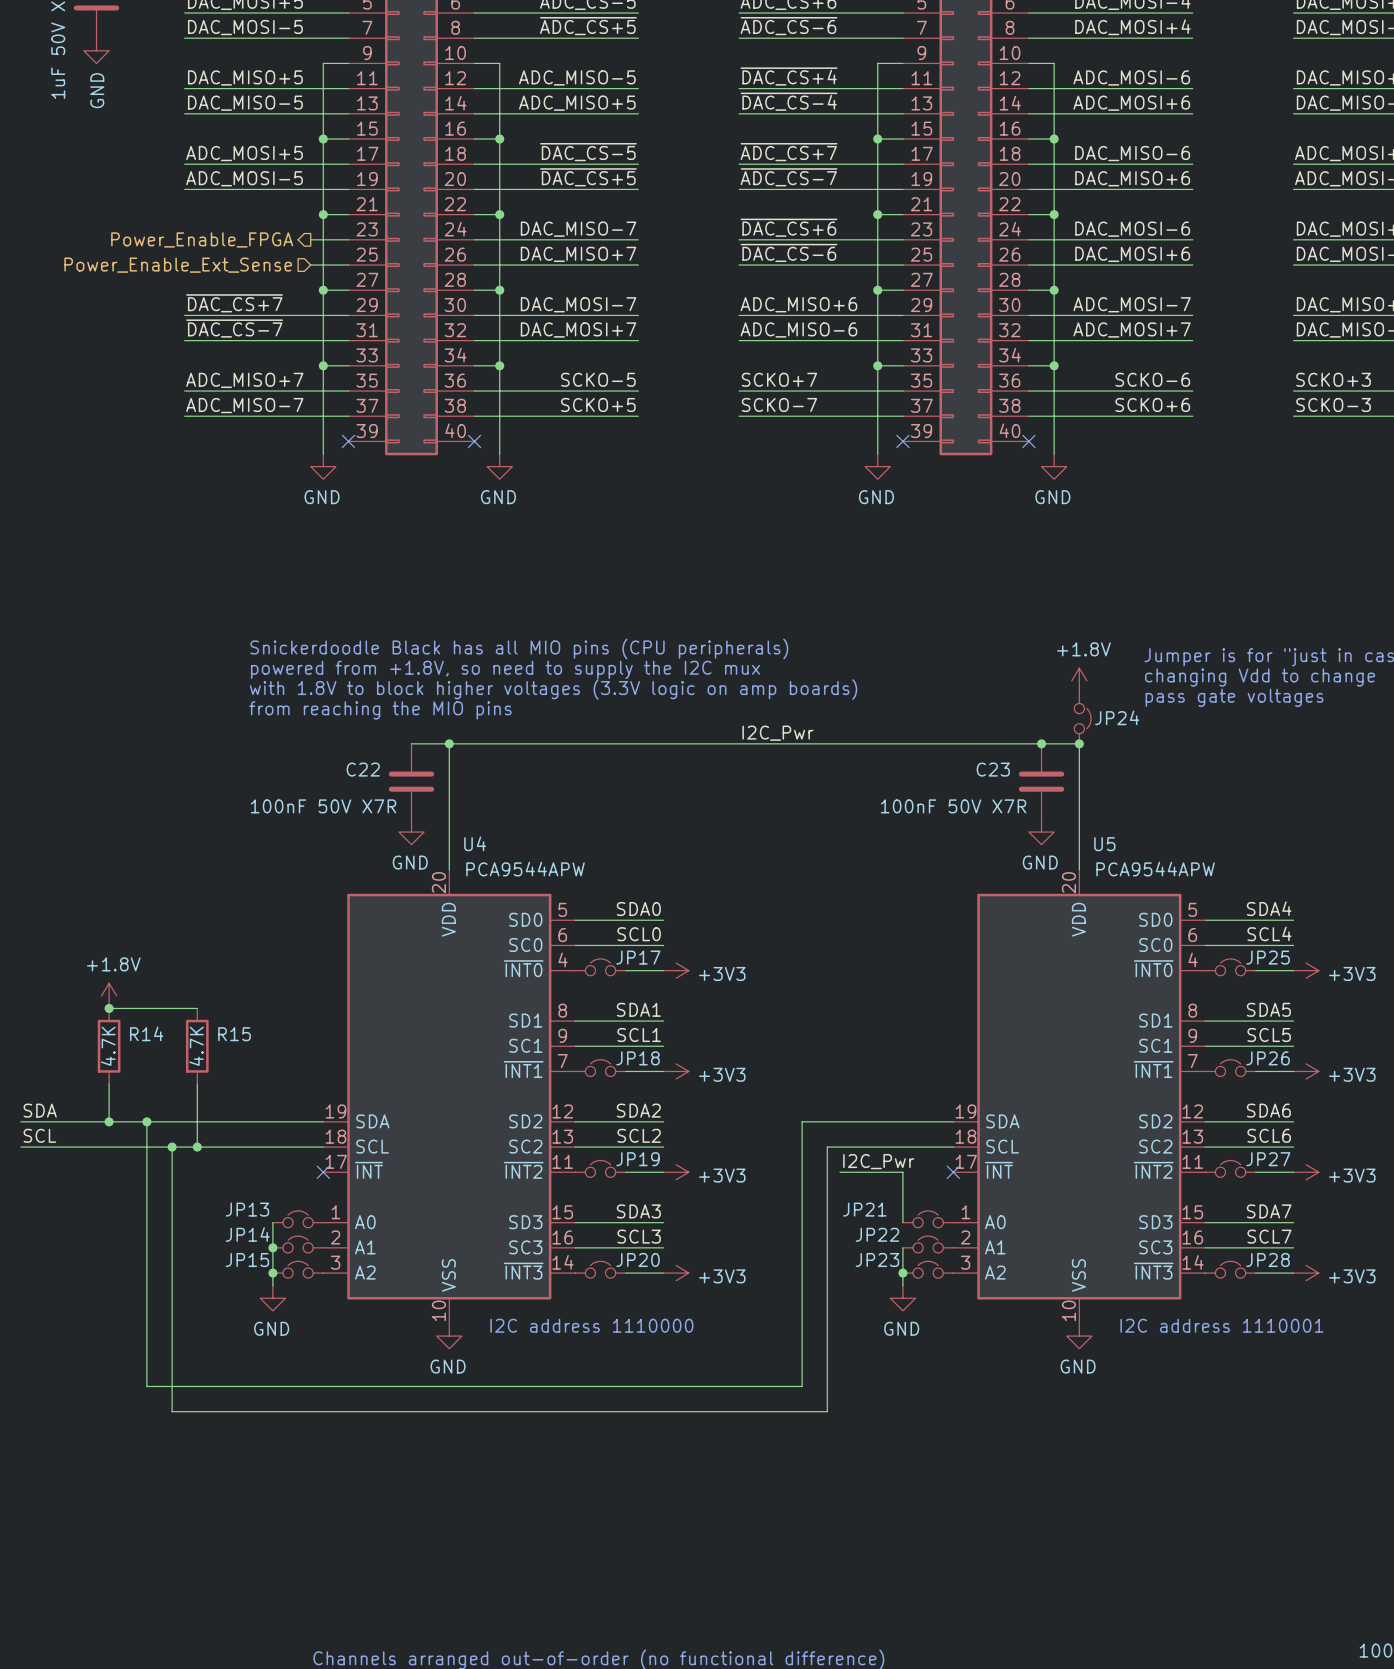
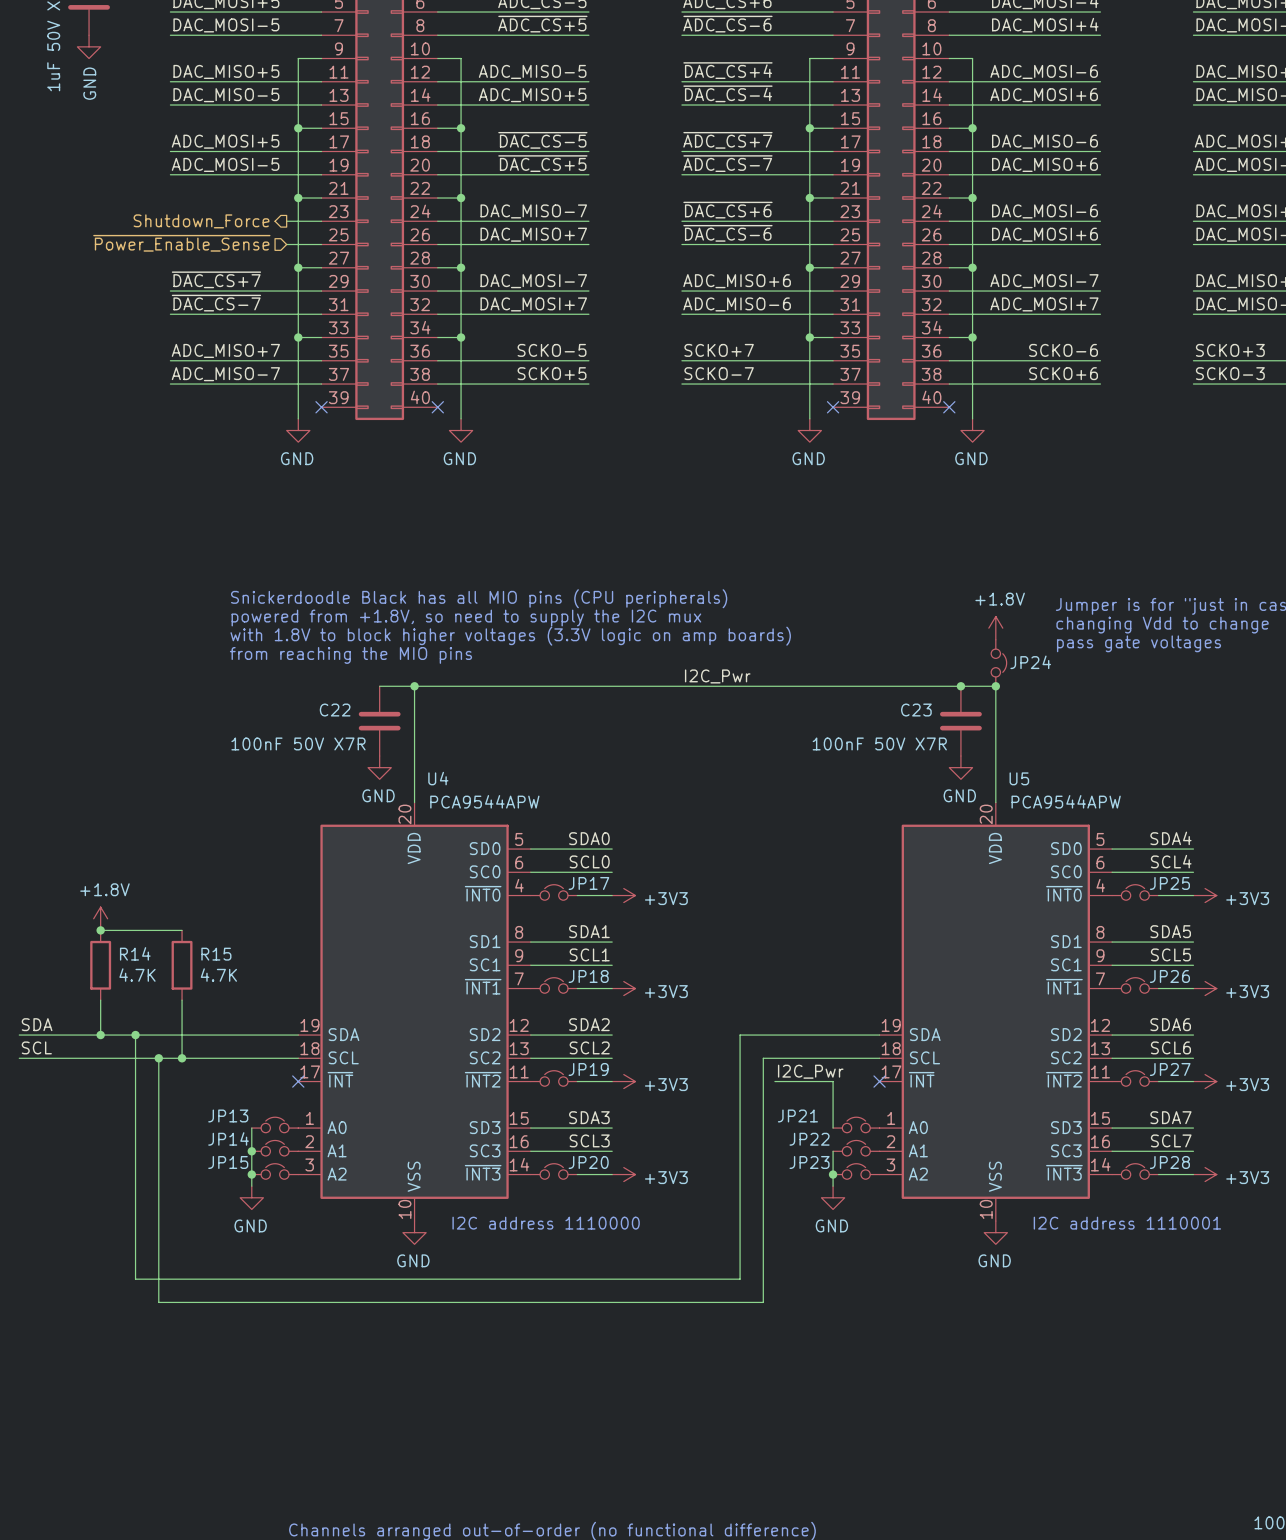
hierarchical label: Power_Enable_FPGA (202, 239) -> Shutdown_Force (201, 221)
hierarchical label: Power_Enable_Ext_Sense (178, 265) -> ~{Power_Enable_Sense} (181, 243)
R14 value rotation: 0° (108, 1046) -> 90° clockwise (137, 975)
R15 value rotation: 0° (196, 1046) -> 90° clockwise (218, 975)

